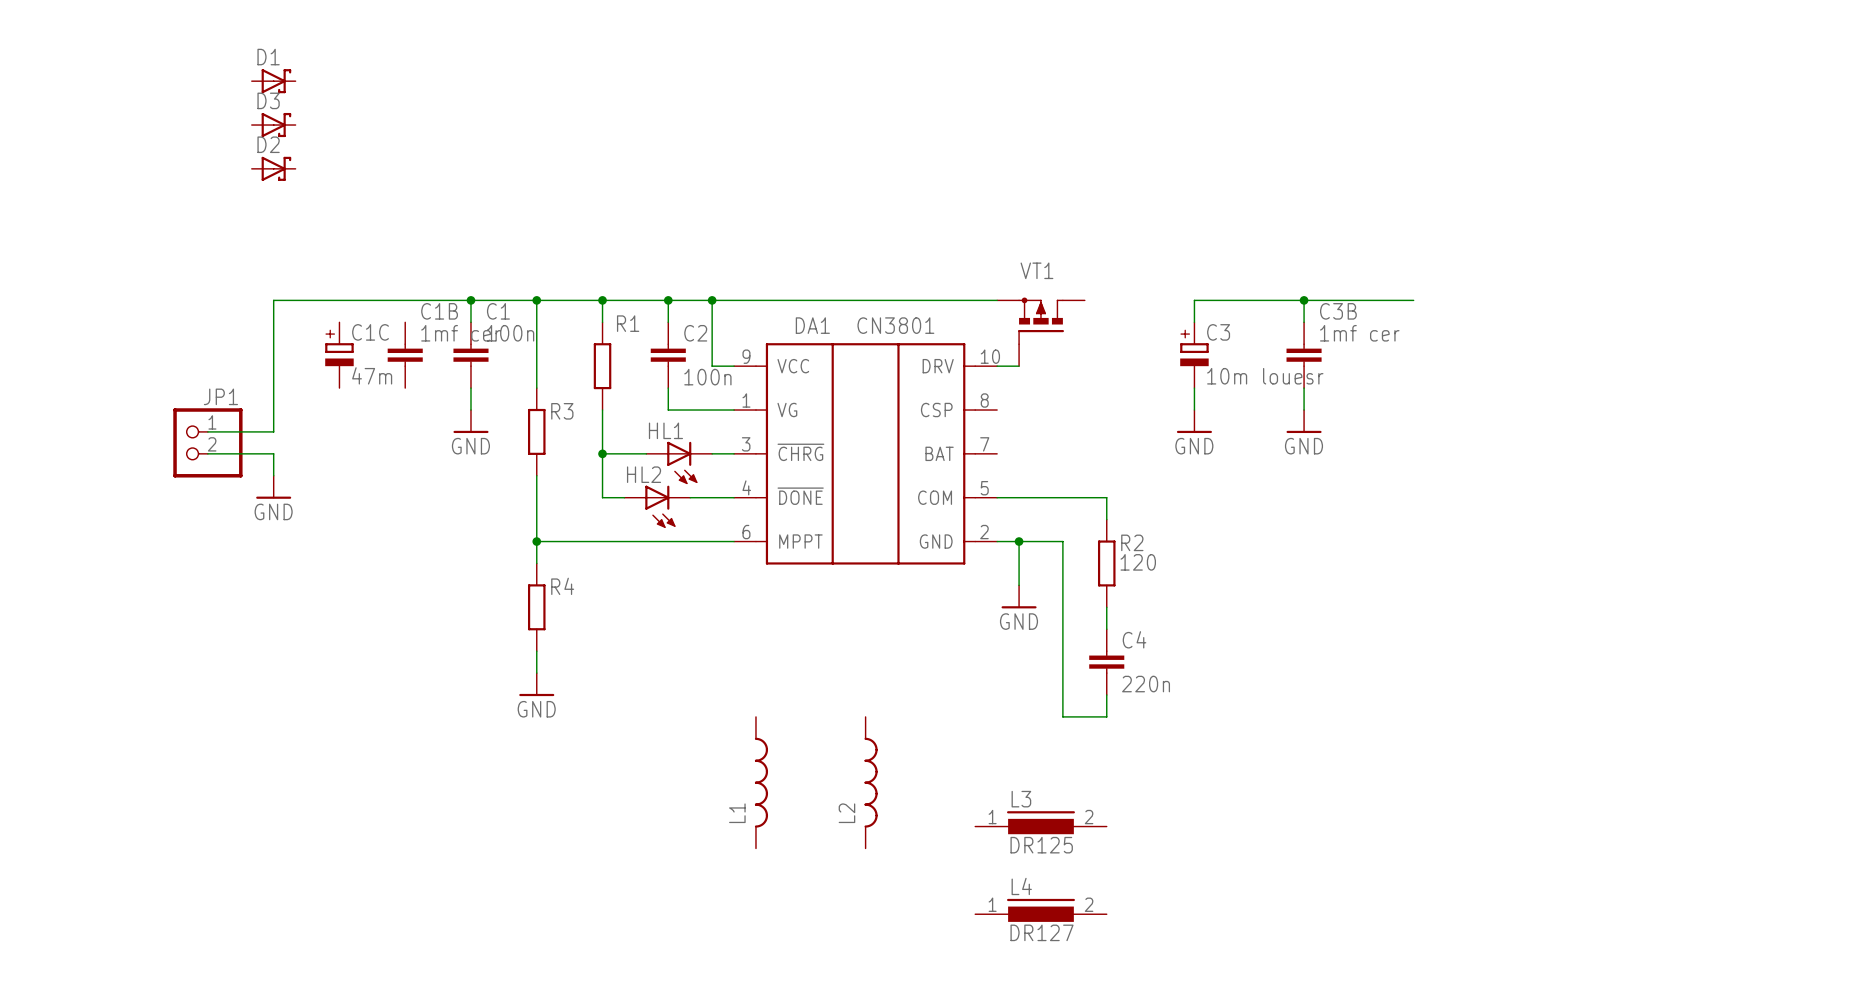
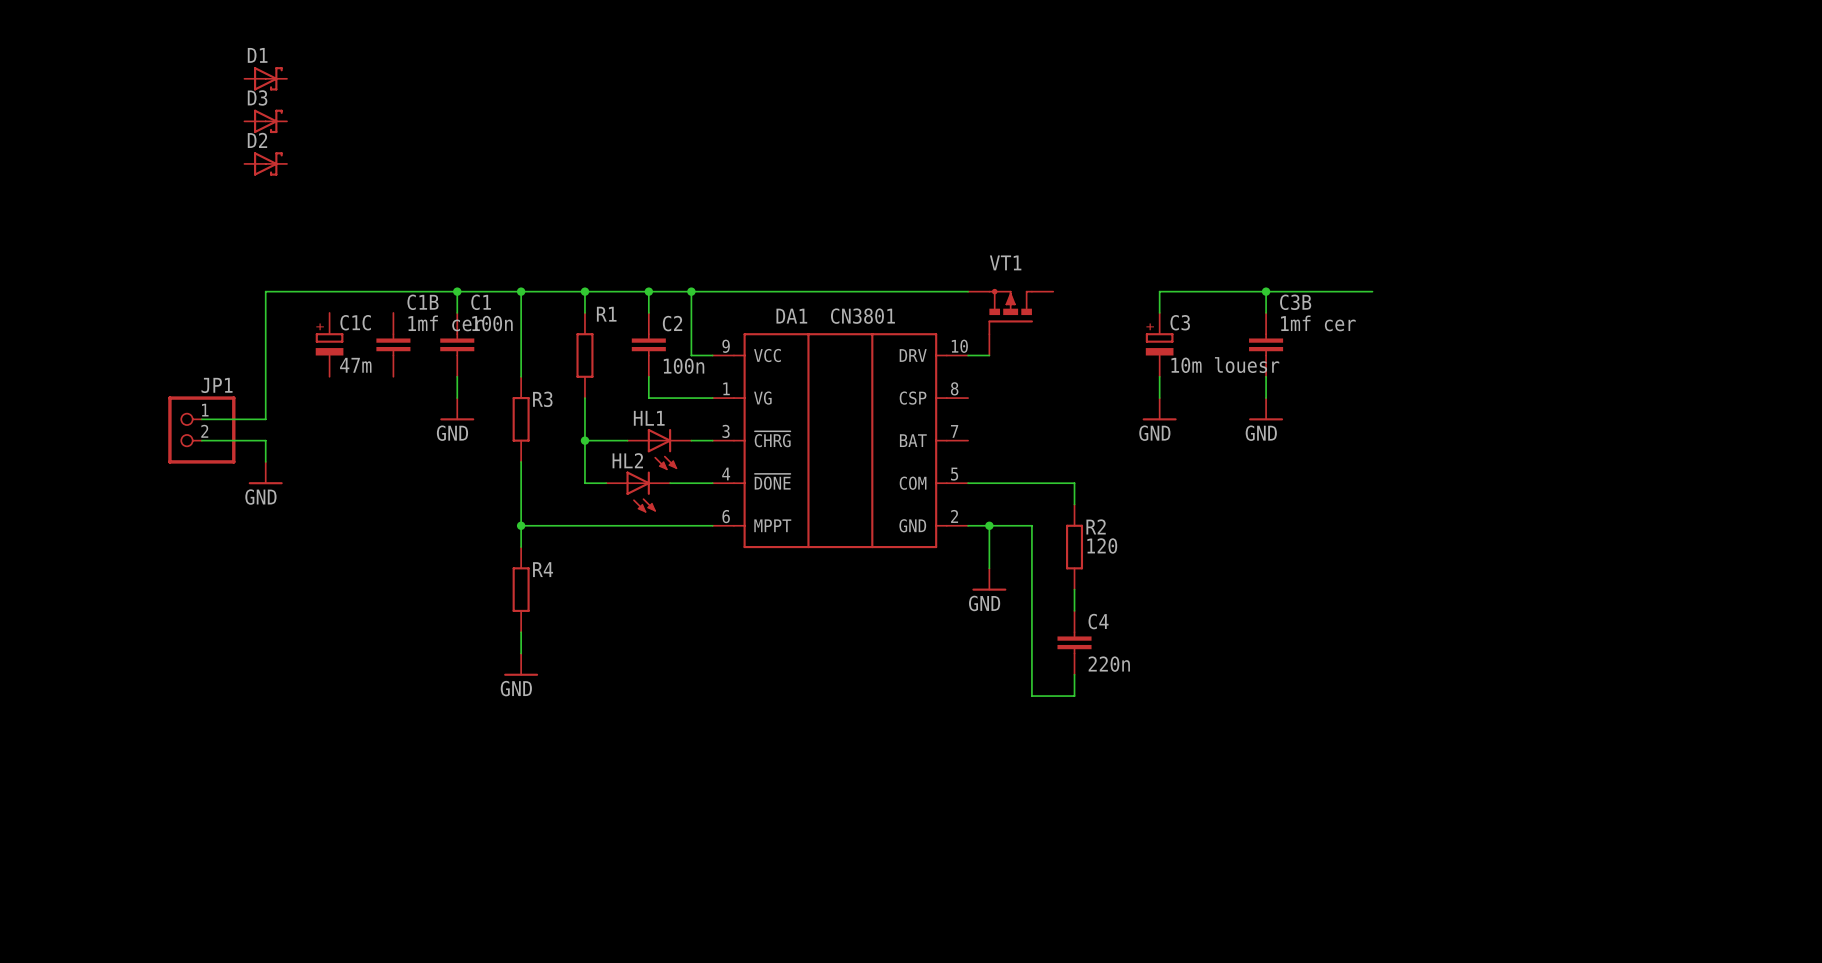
L1: (761, 782) -> none
L2: (871, 782) -> none
L3: DR125 (1040, 822) -> none
L4: DR127 (1040, 910) -> none

